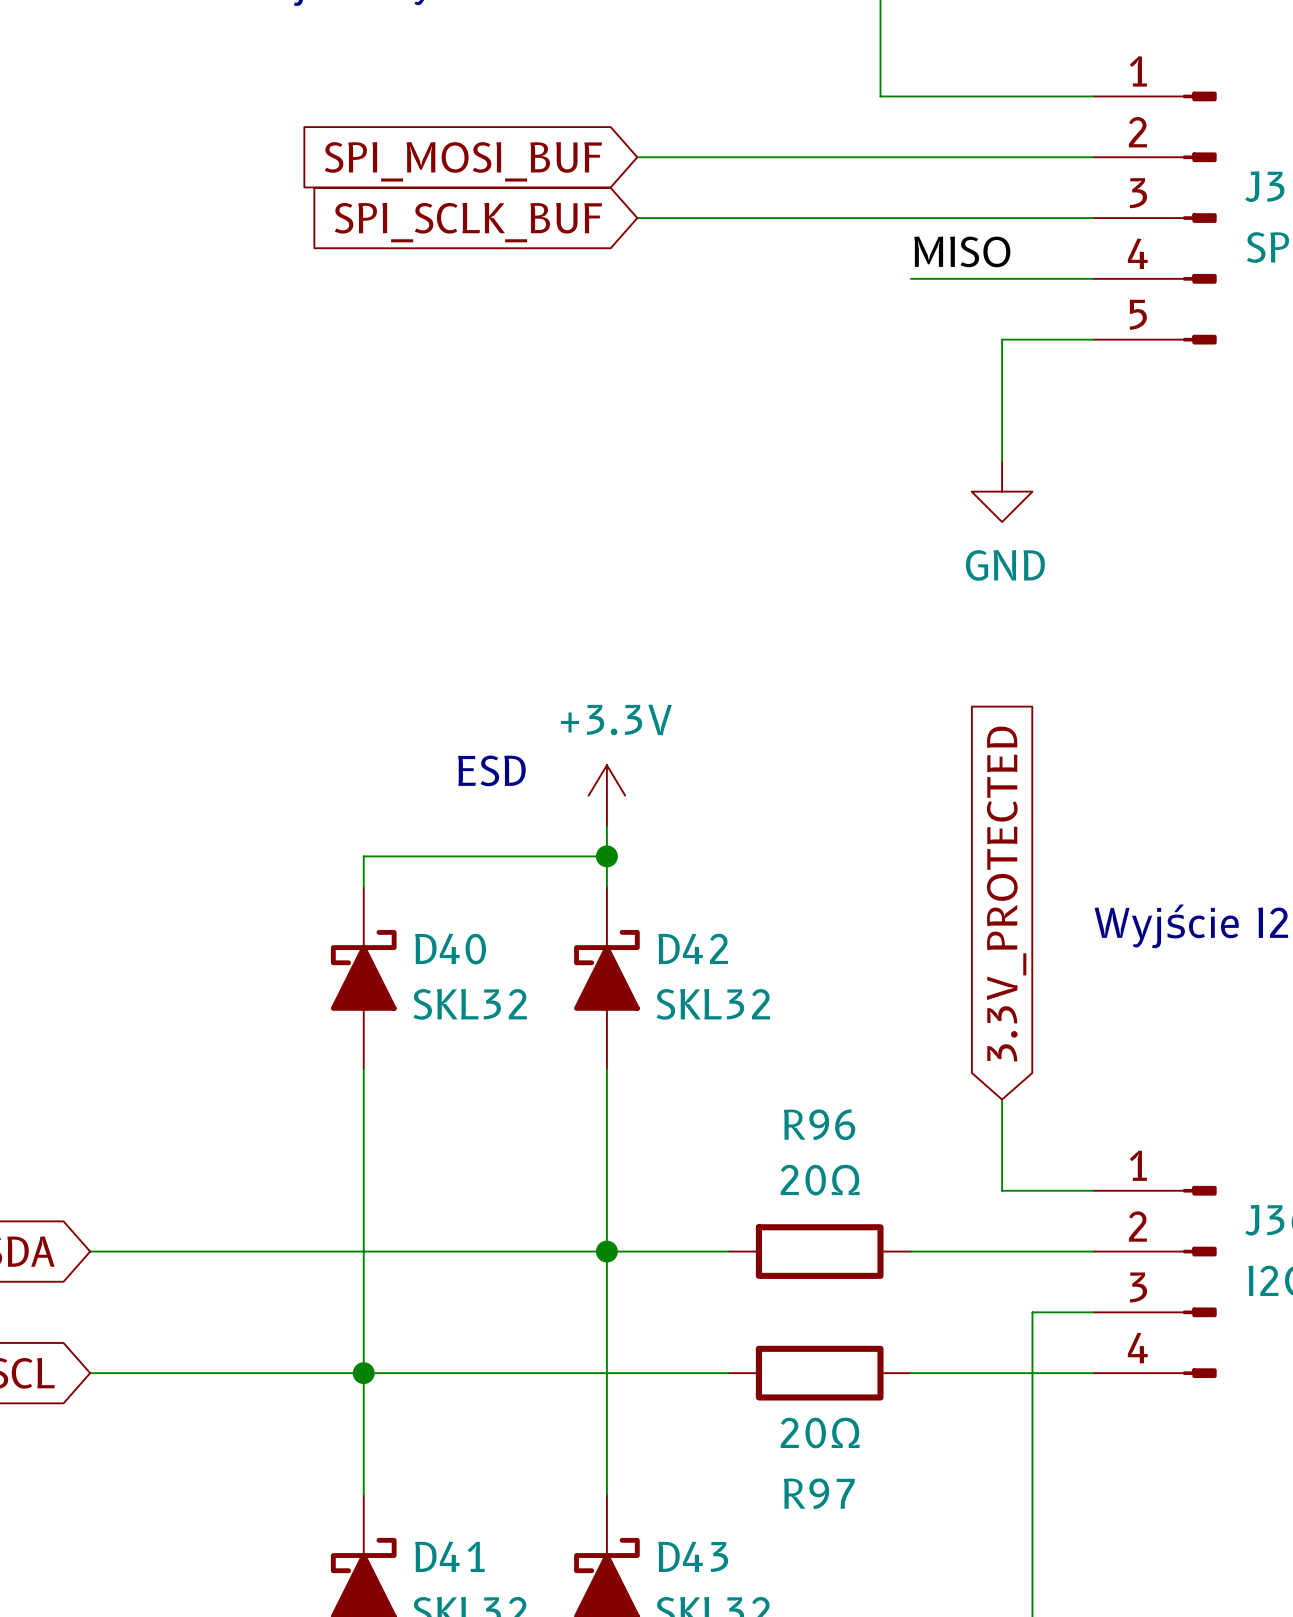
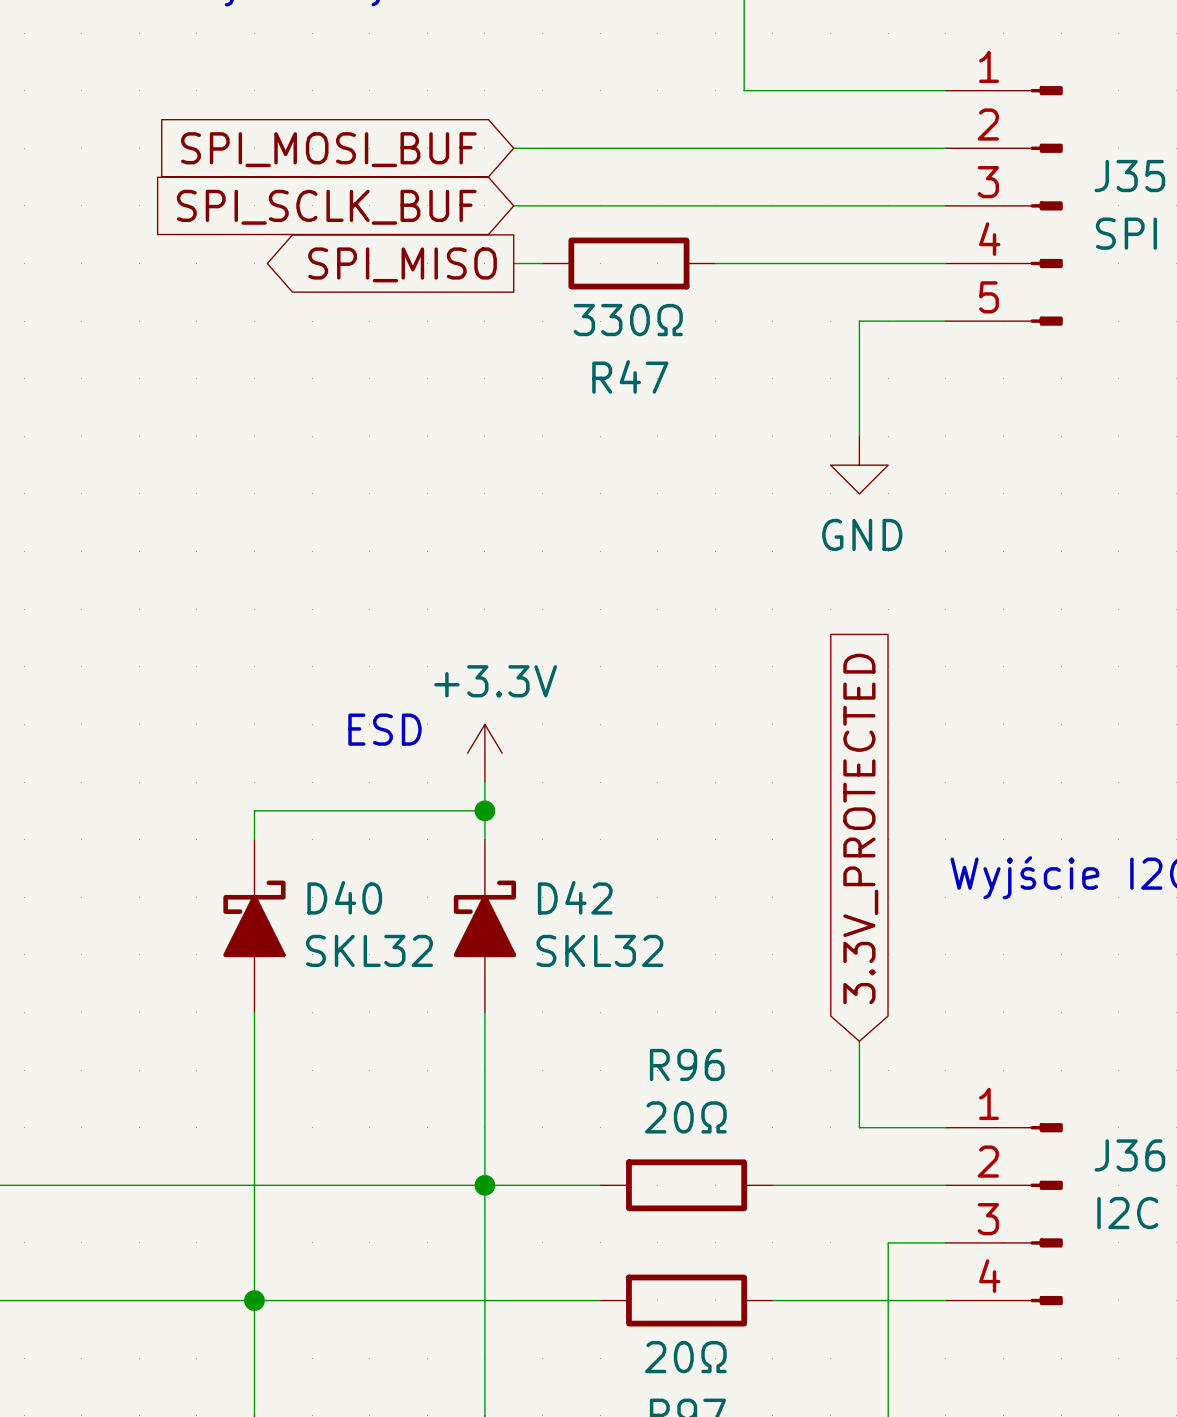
label: MISO (962, 251) -> none
wire: none -> (513, 263) (542, 263)
R47: none -> 330Ω (628, 263)
wire: none -> (715, 263) (772, 263)
global label: none -> SPI_MISO (402, 264)

